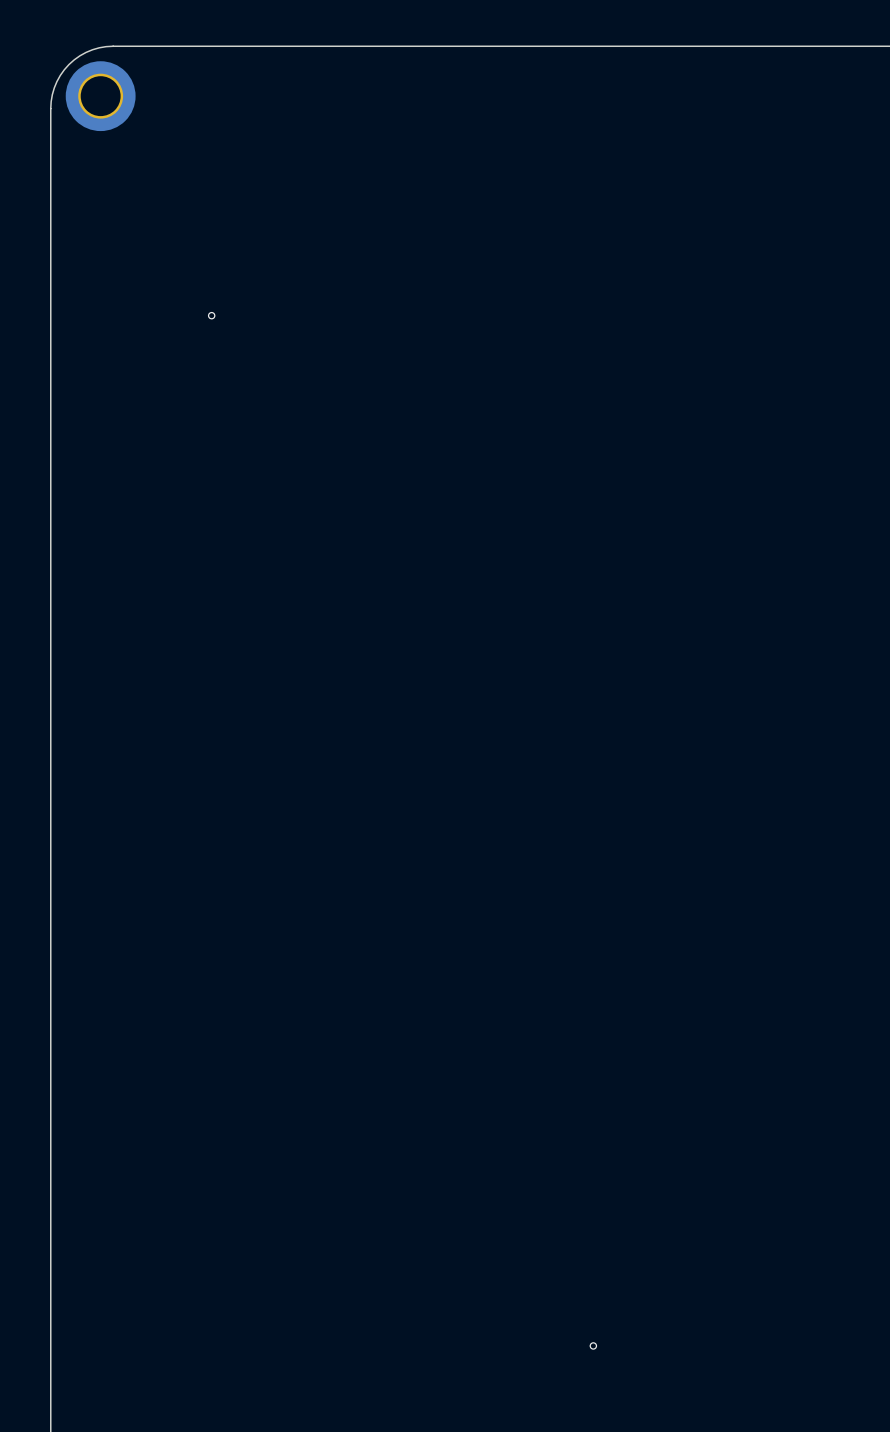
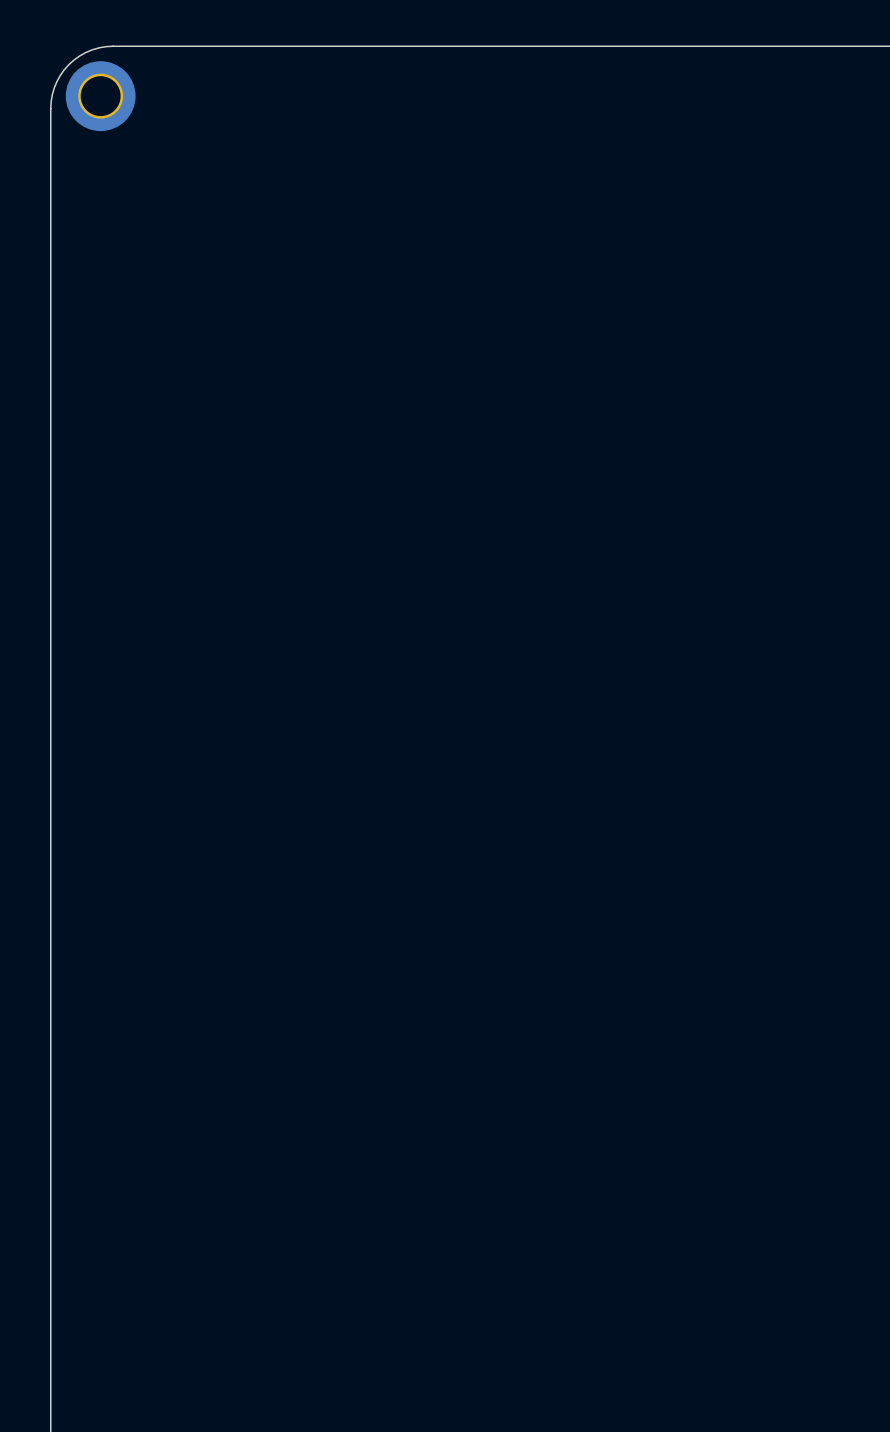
via: (211, 315) -> none
via: (593, 1345) -> none

